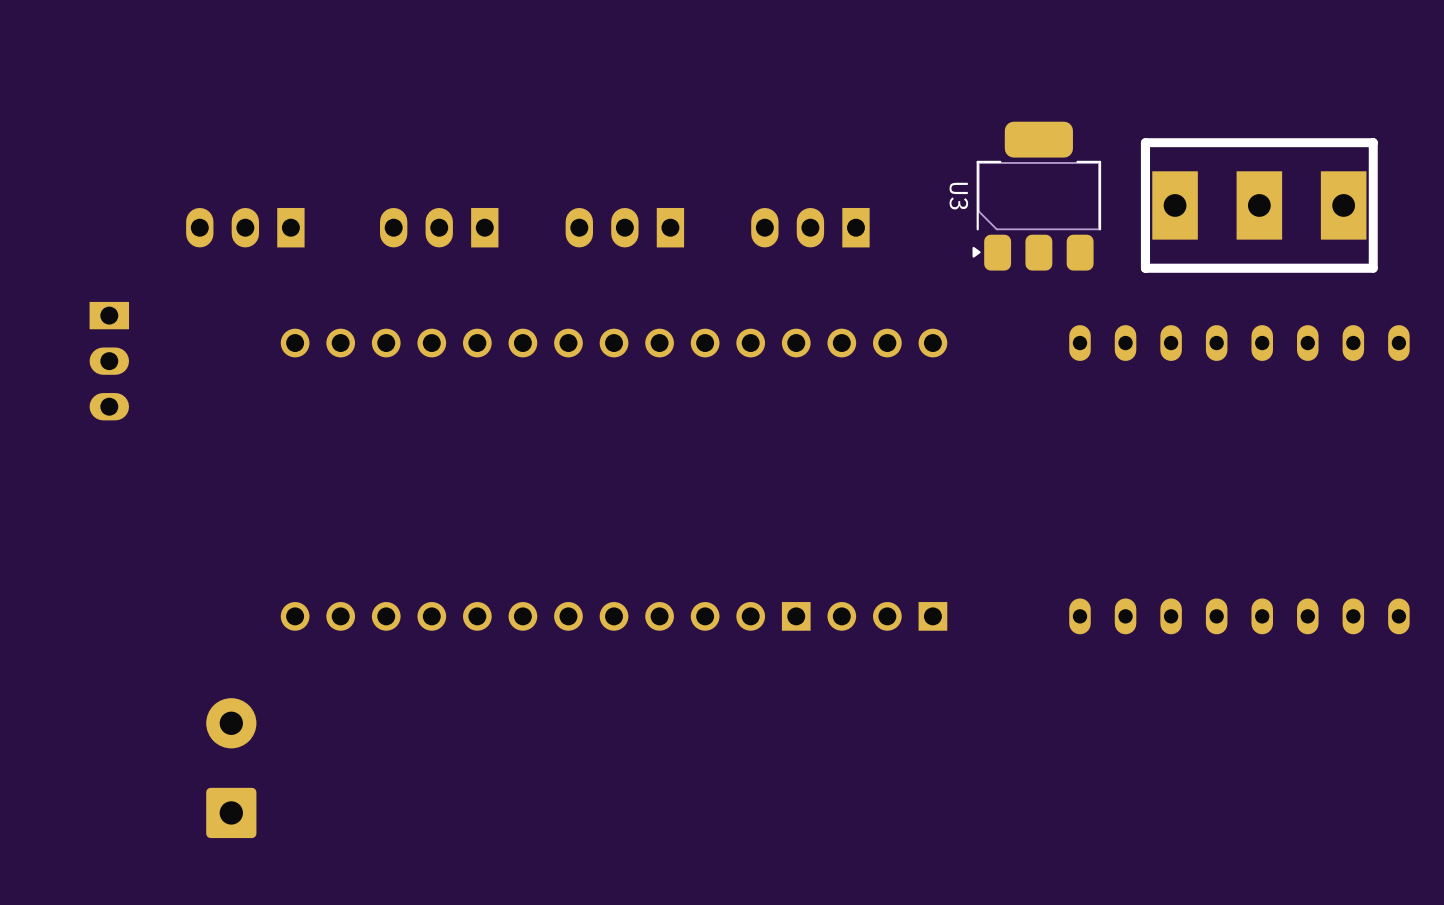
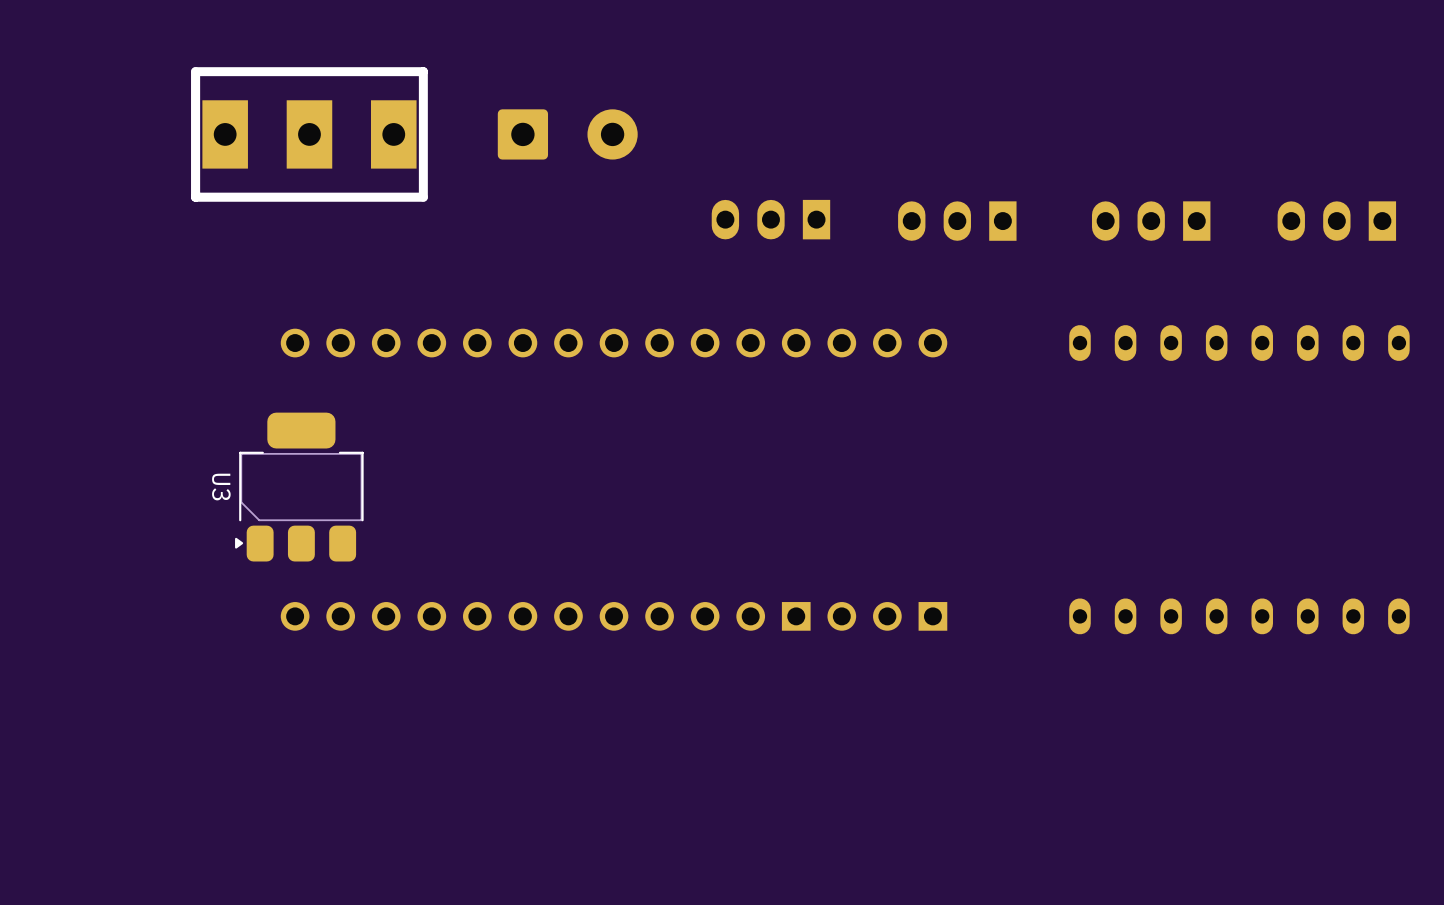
part: none -> (309, 134)
part: none -> (567, 134)
U3 position: (1036, 196) -> (299, 487)
part: (1259, 205) -> none
part: none -> (957, 221)
part: none -> (1151, 221)
part: none -> (1336, 221)
part: (245, 227) -> none
part: (439, 227) -> none
part: (624, 227) -> none
part position: (810, 227) -> (770, 219)
part: (109, 361) -> none
part: (231, 768) -> none

